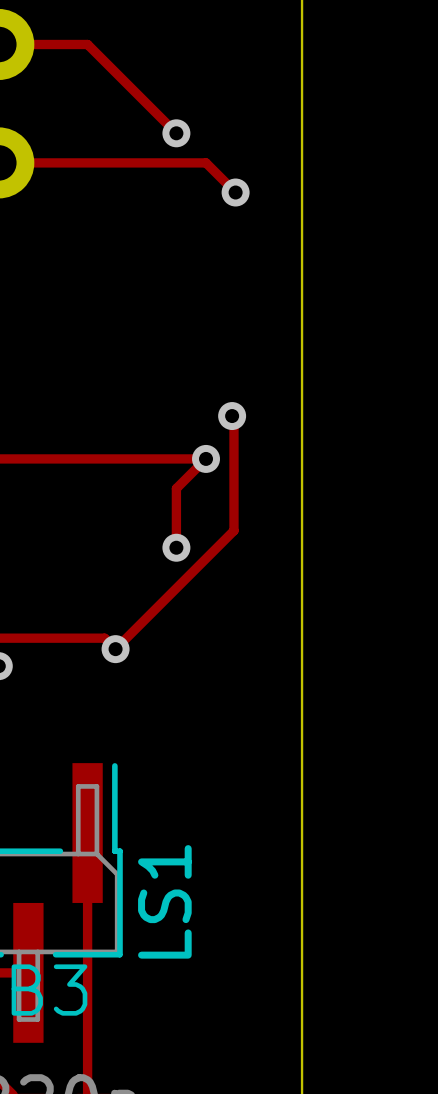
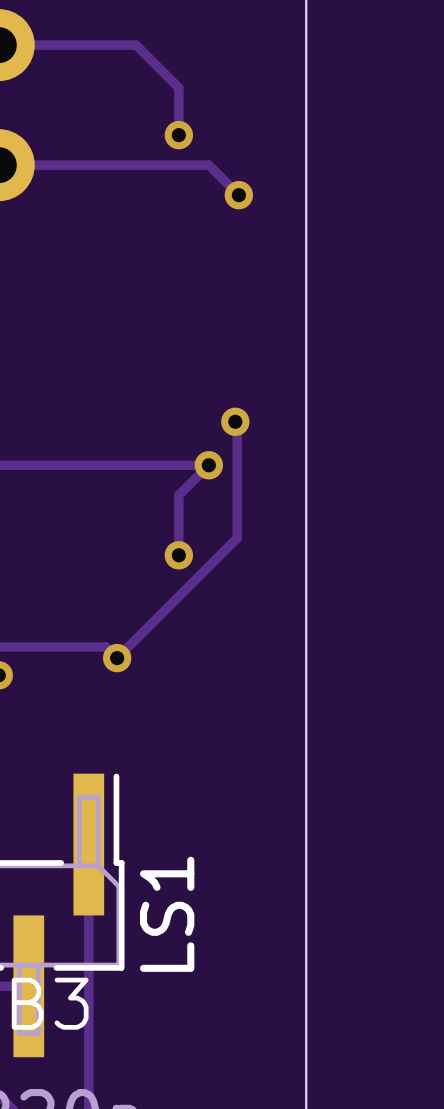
track: (87, 44) (176, 133) -> (88, 45) (136, 45) (178, 87) (178, 135)

